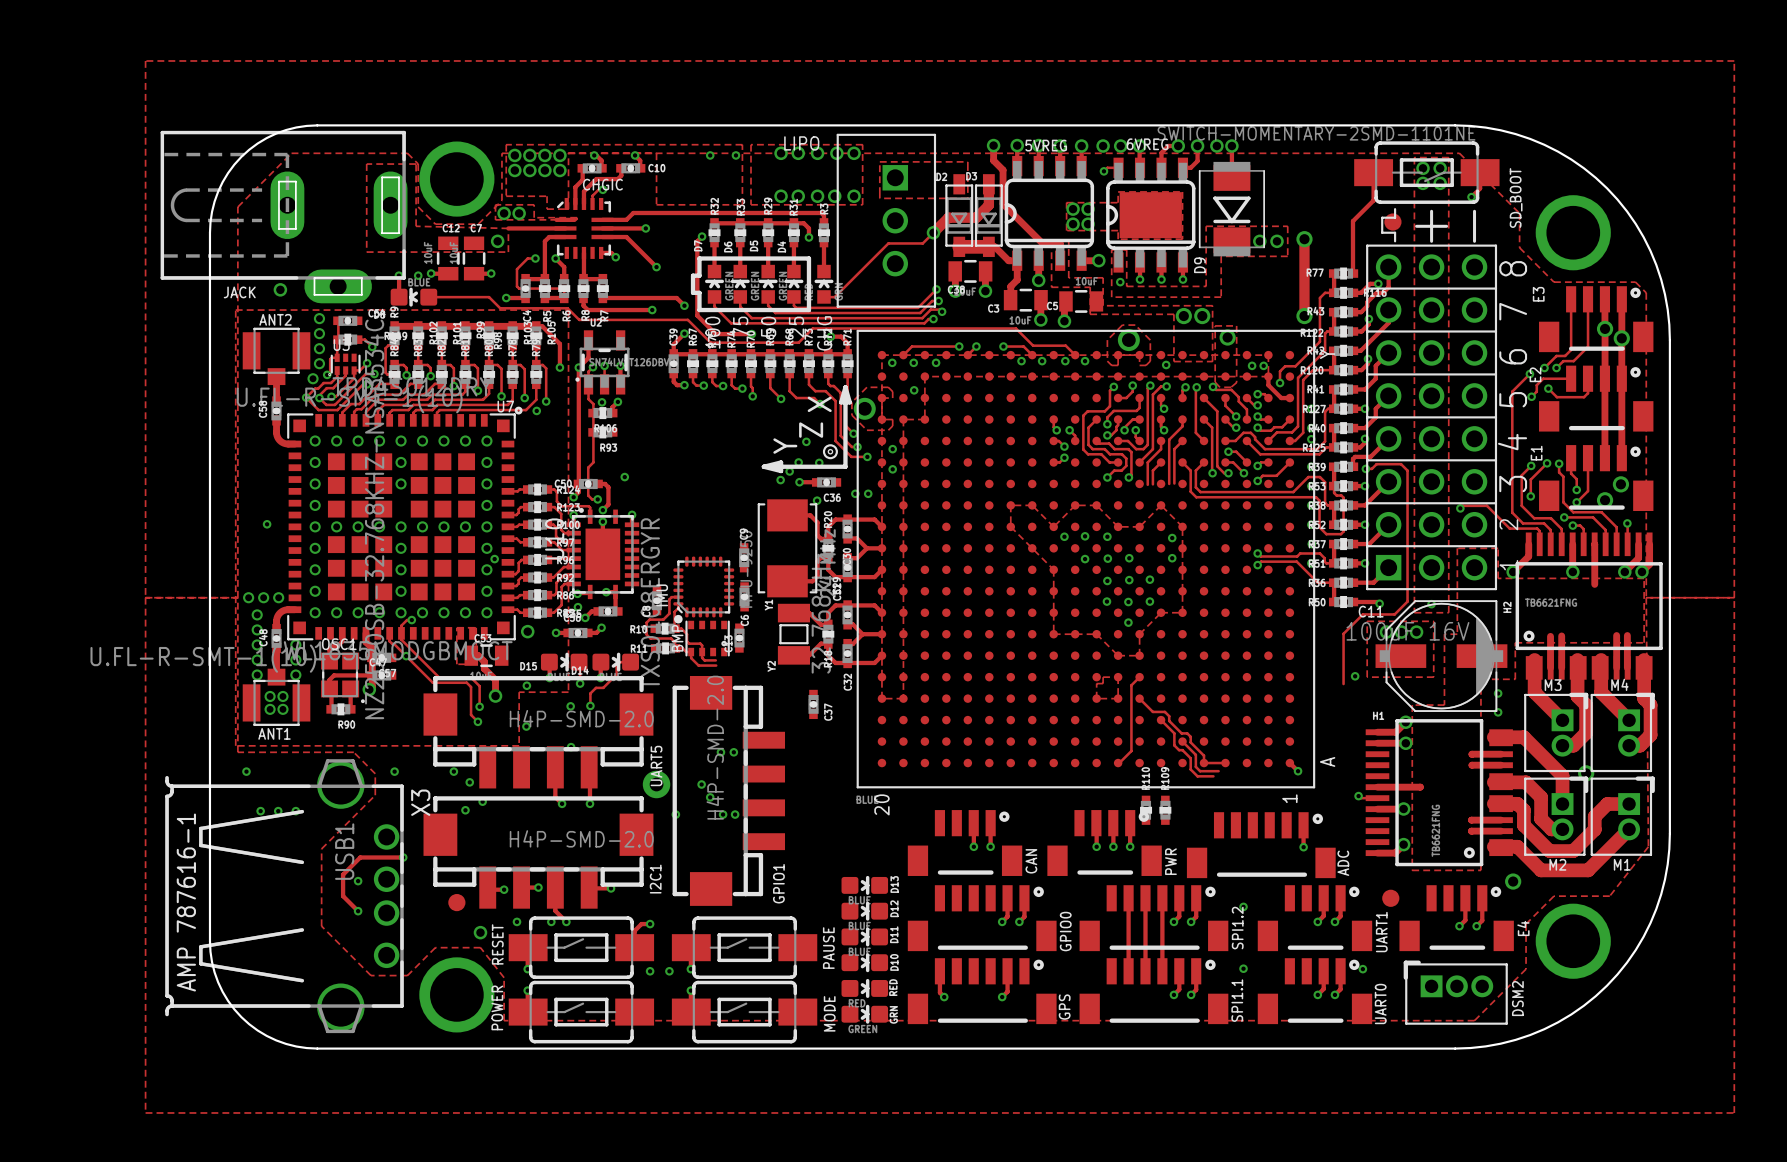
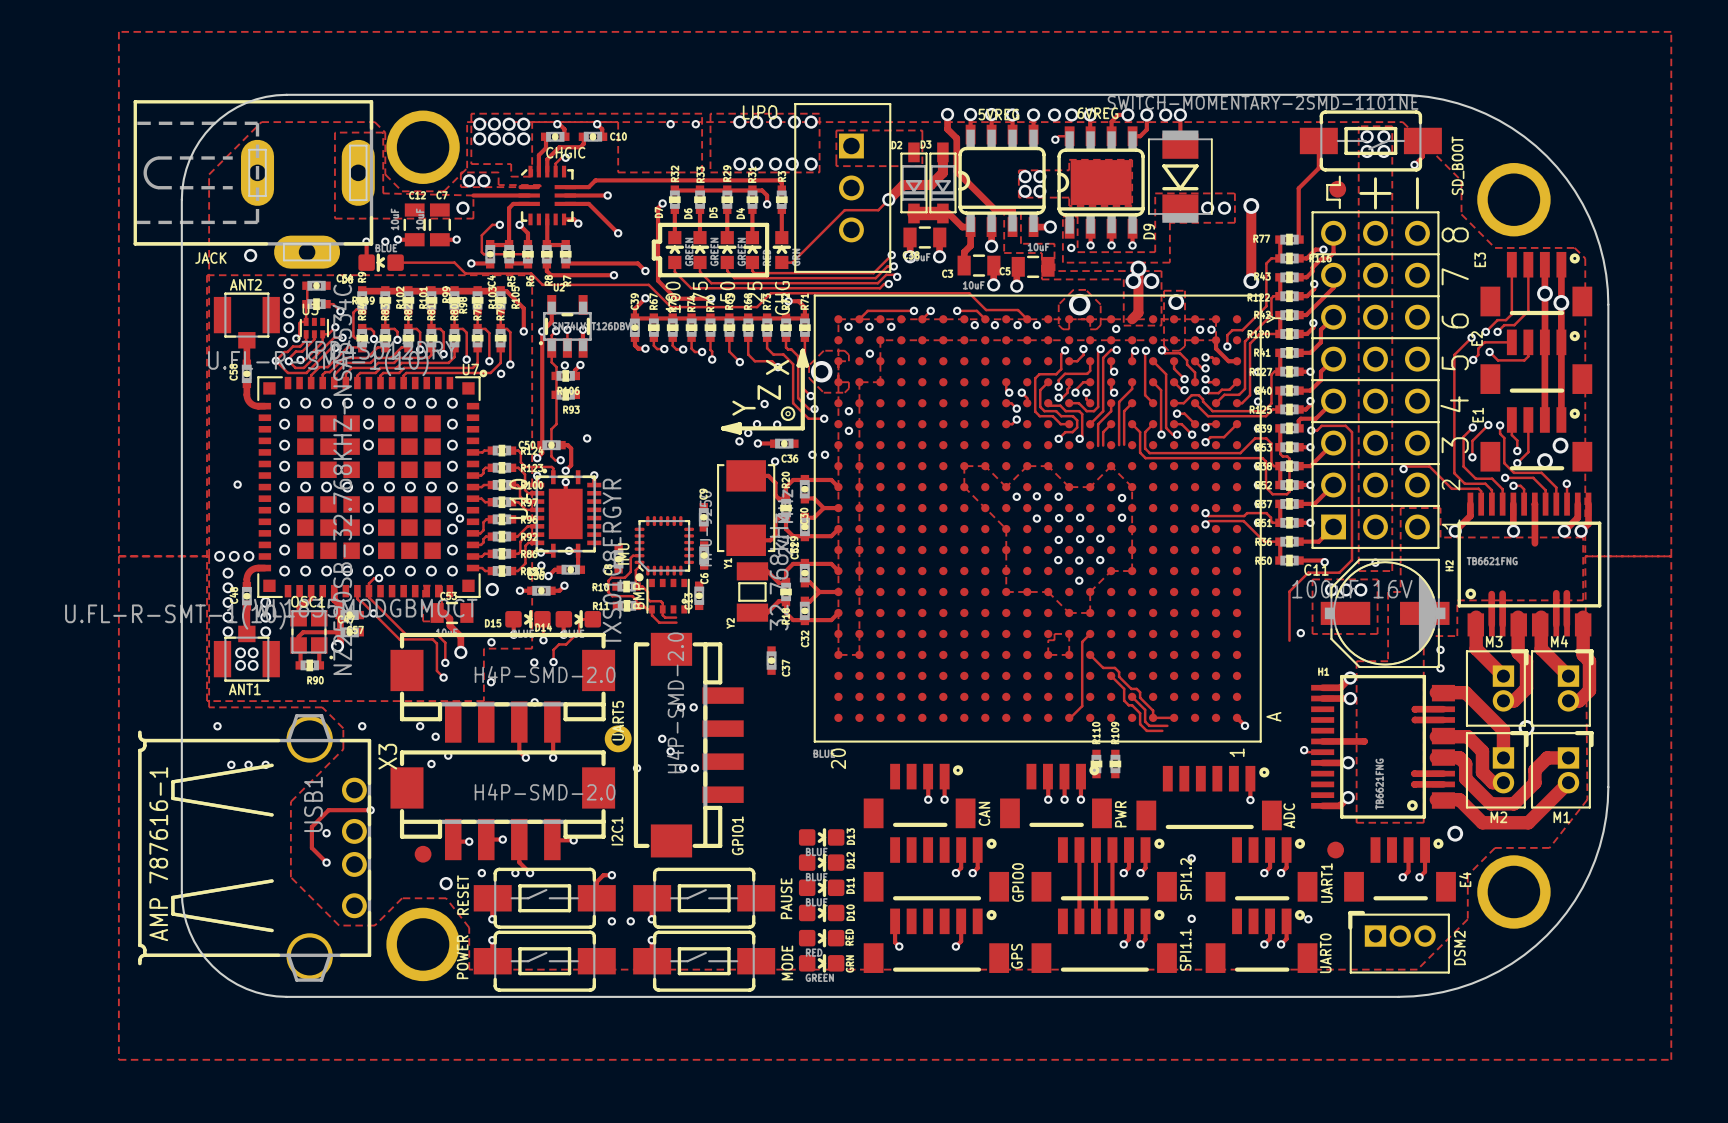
track: none -> (1138, 268) (1138, 312) (1132, 319)
via: none -> (1138, 268)

